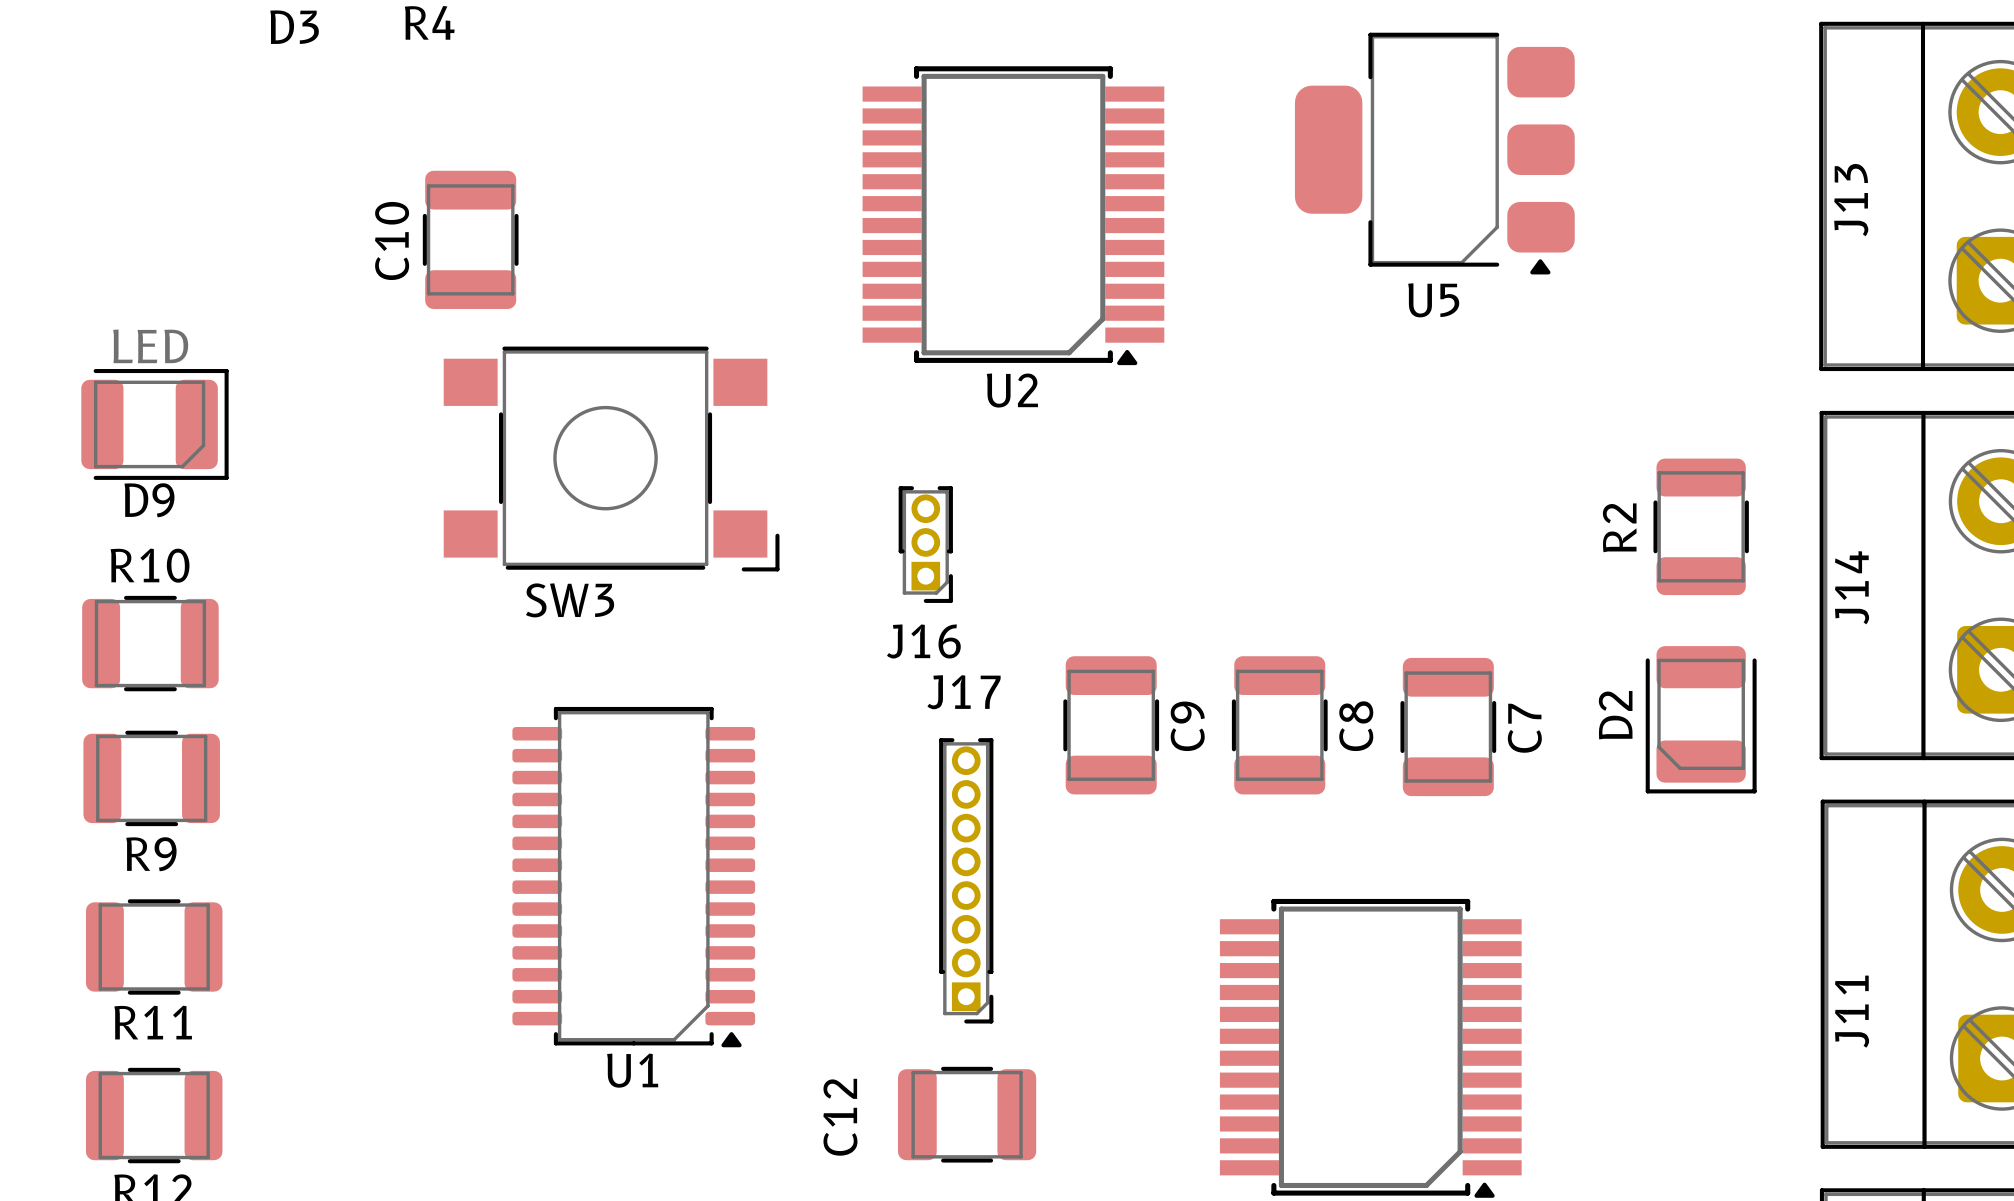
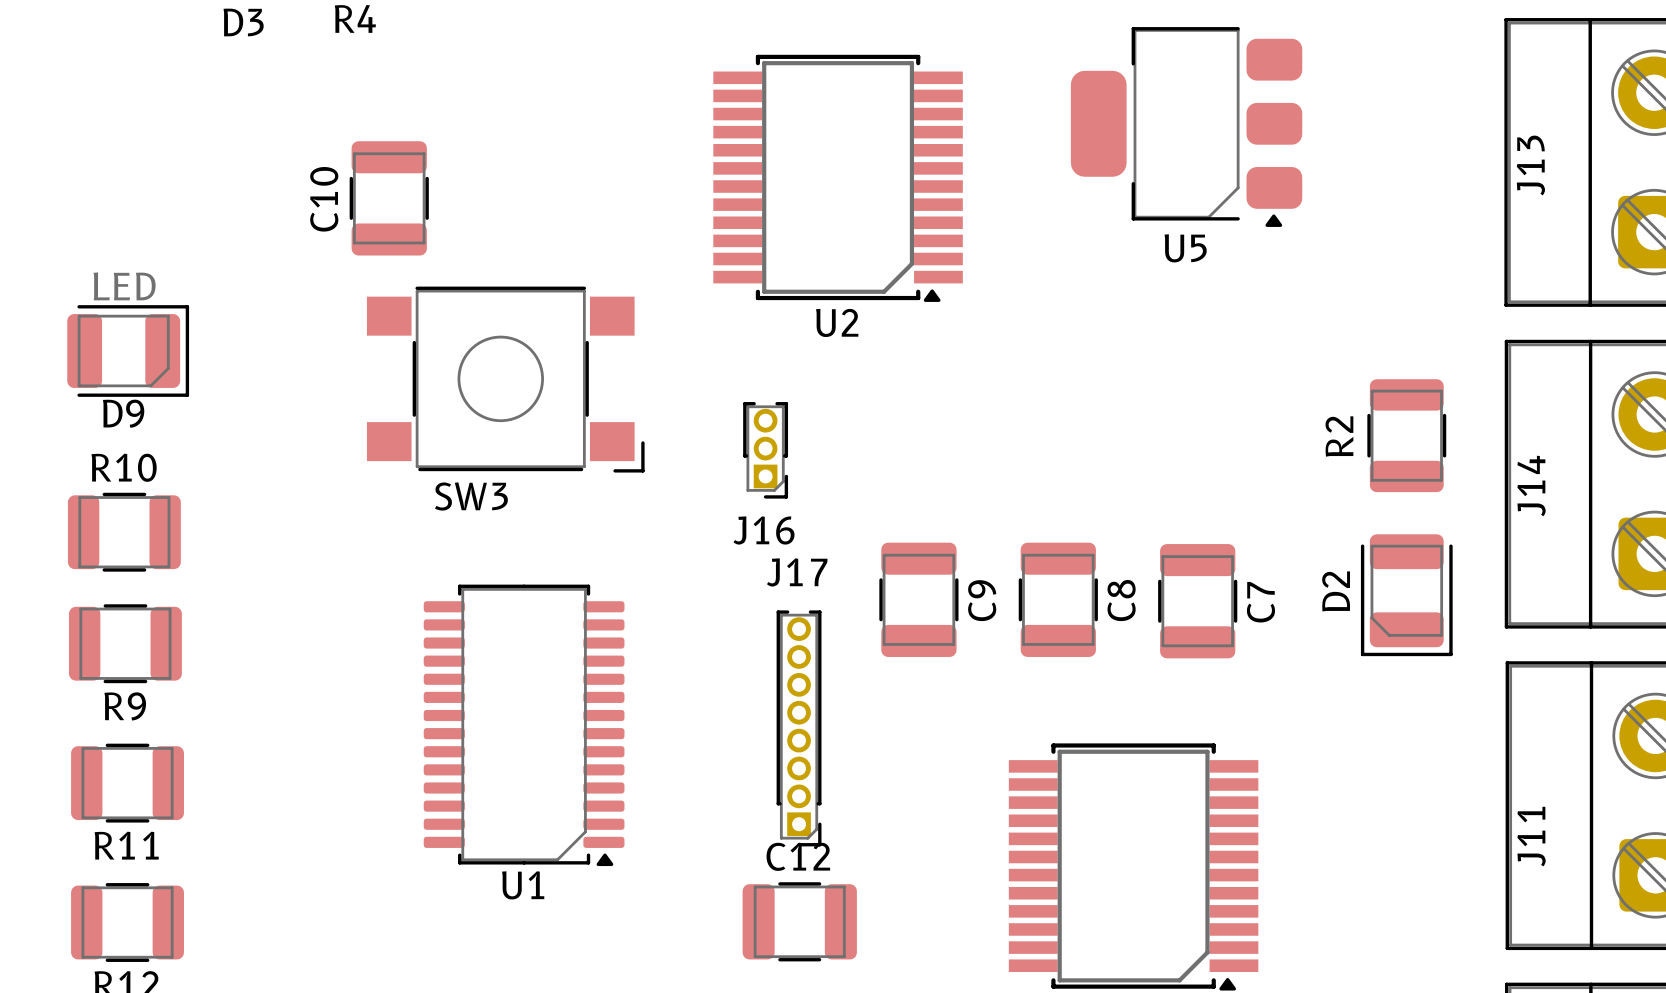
C12 name rotation: 0° (840, 1117) -> 90° clockwise (798, 856)
C12 name position: C12 (840, 1117) -> C12 (798, 856)

